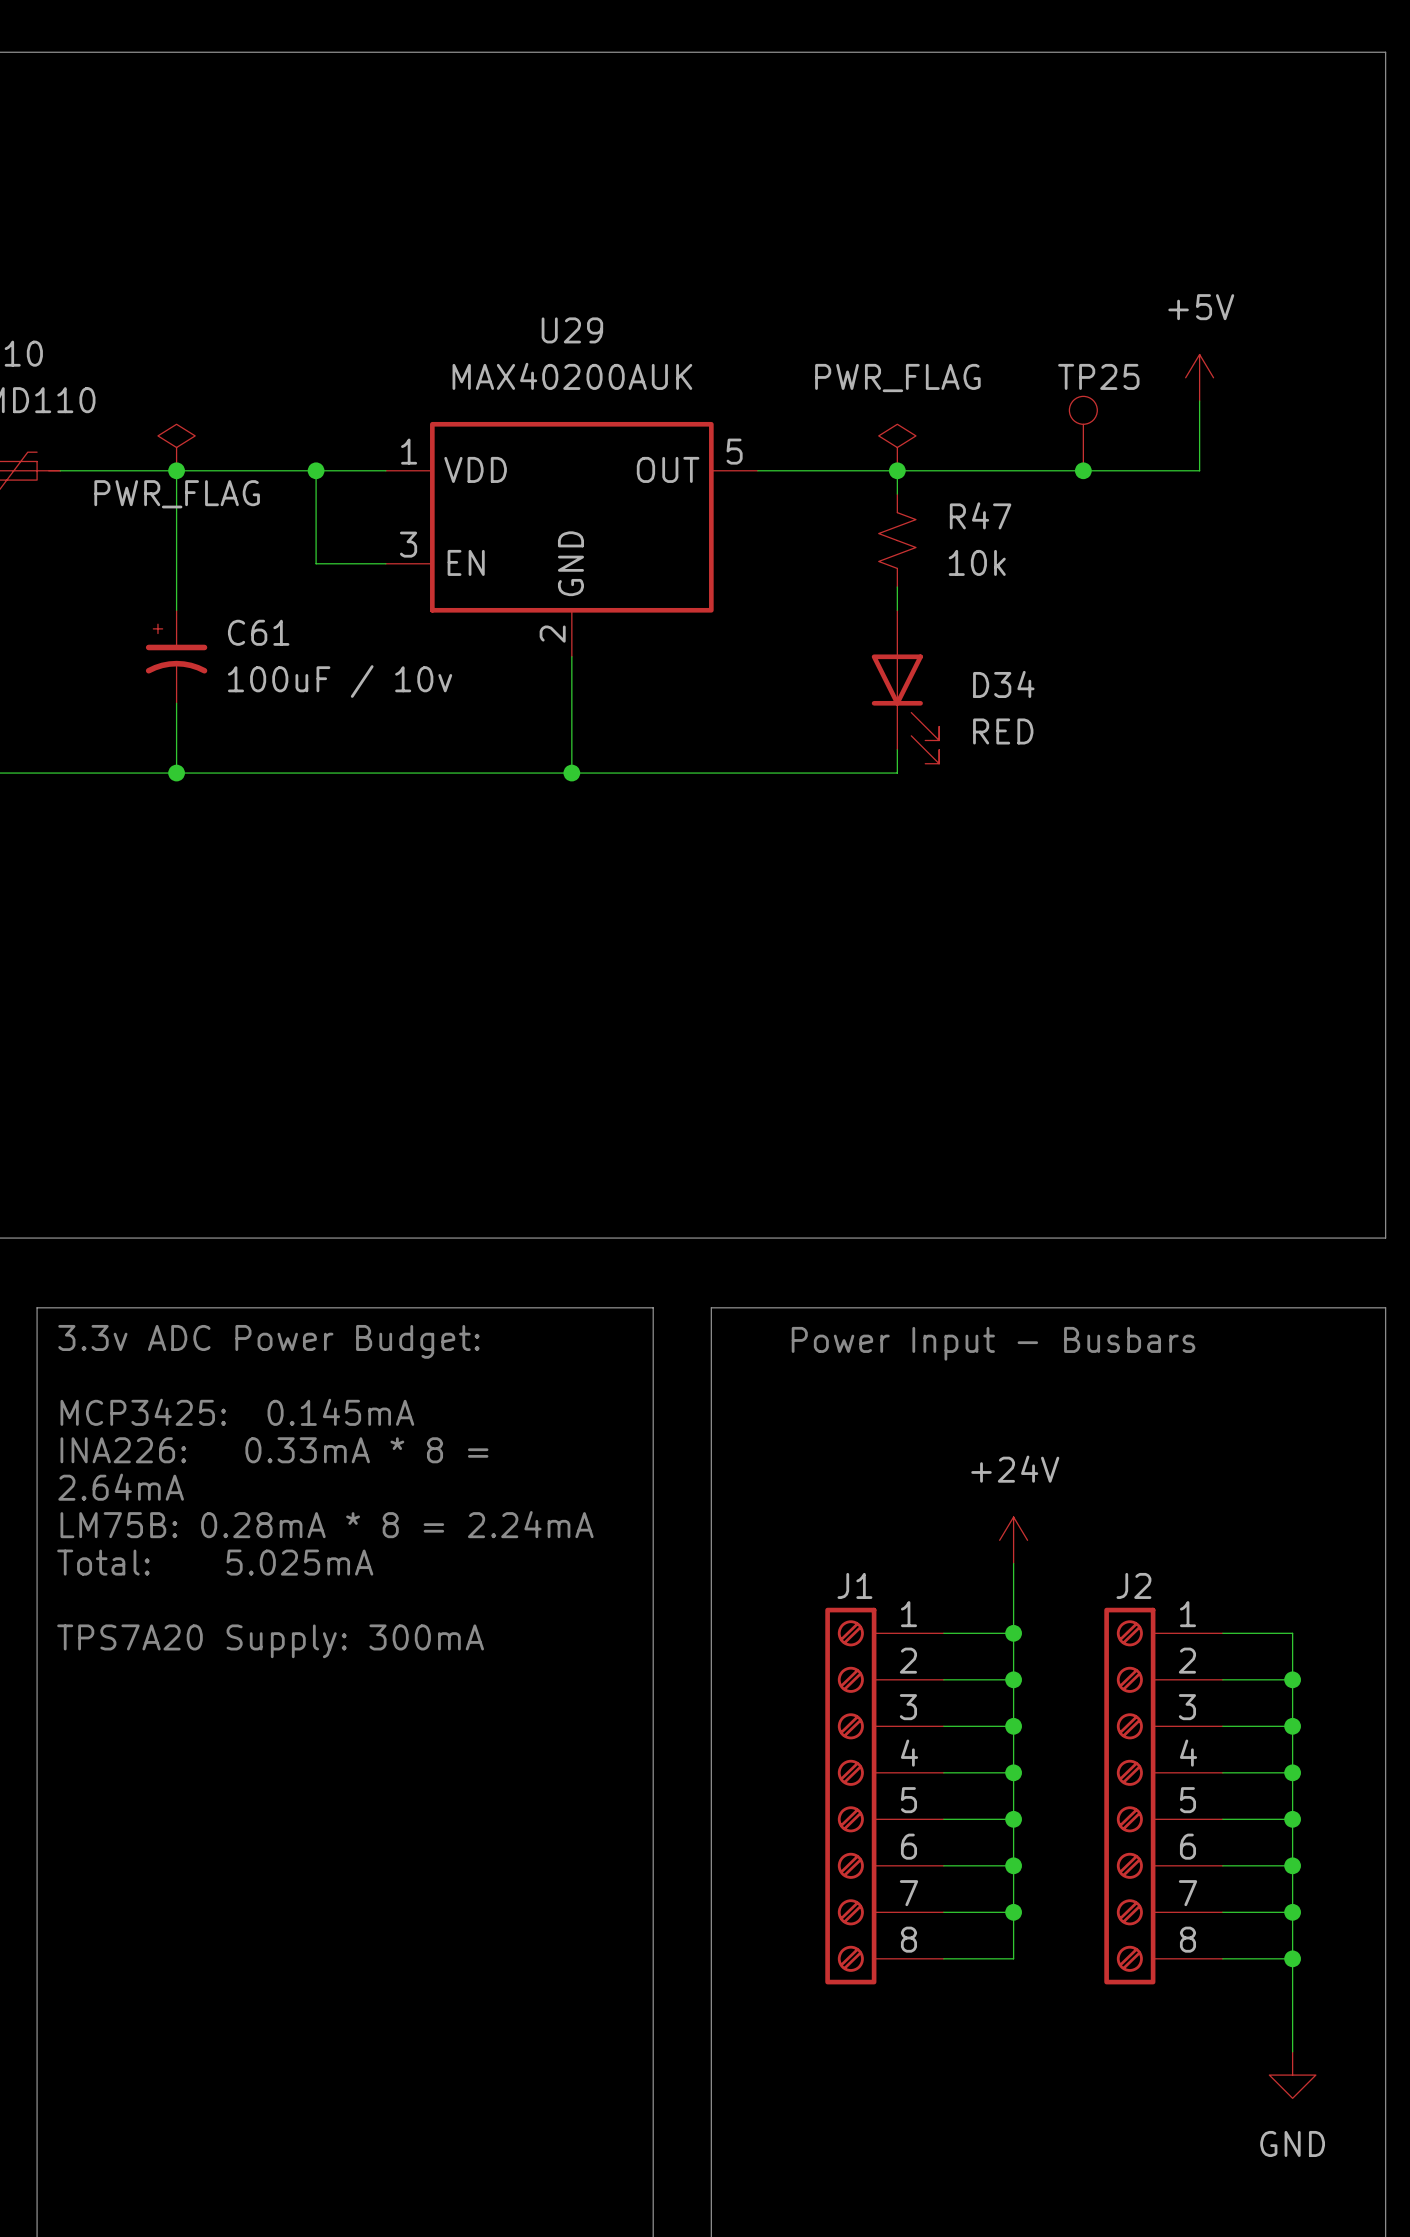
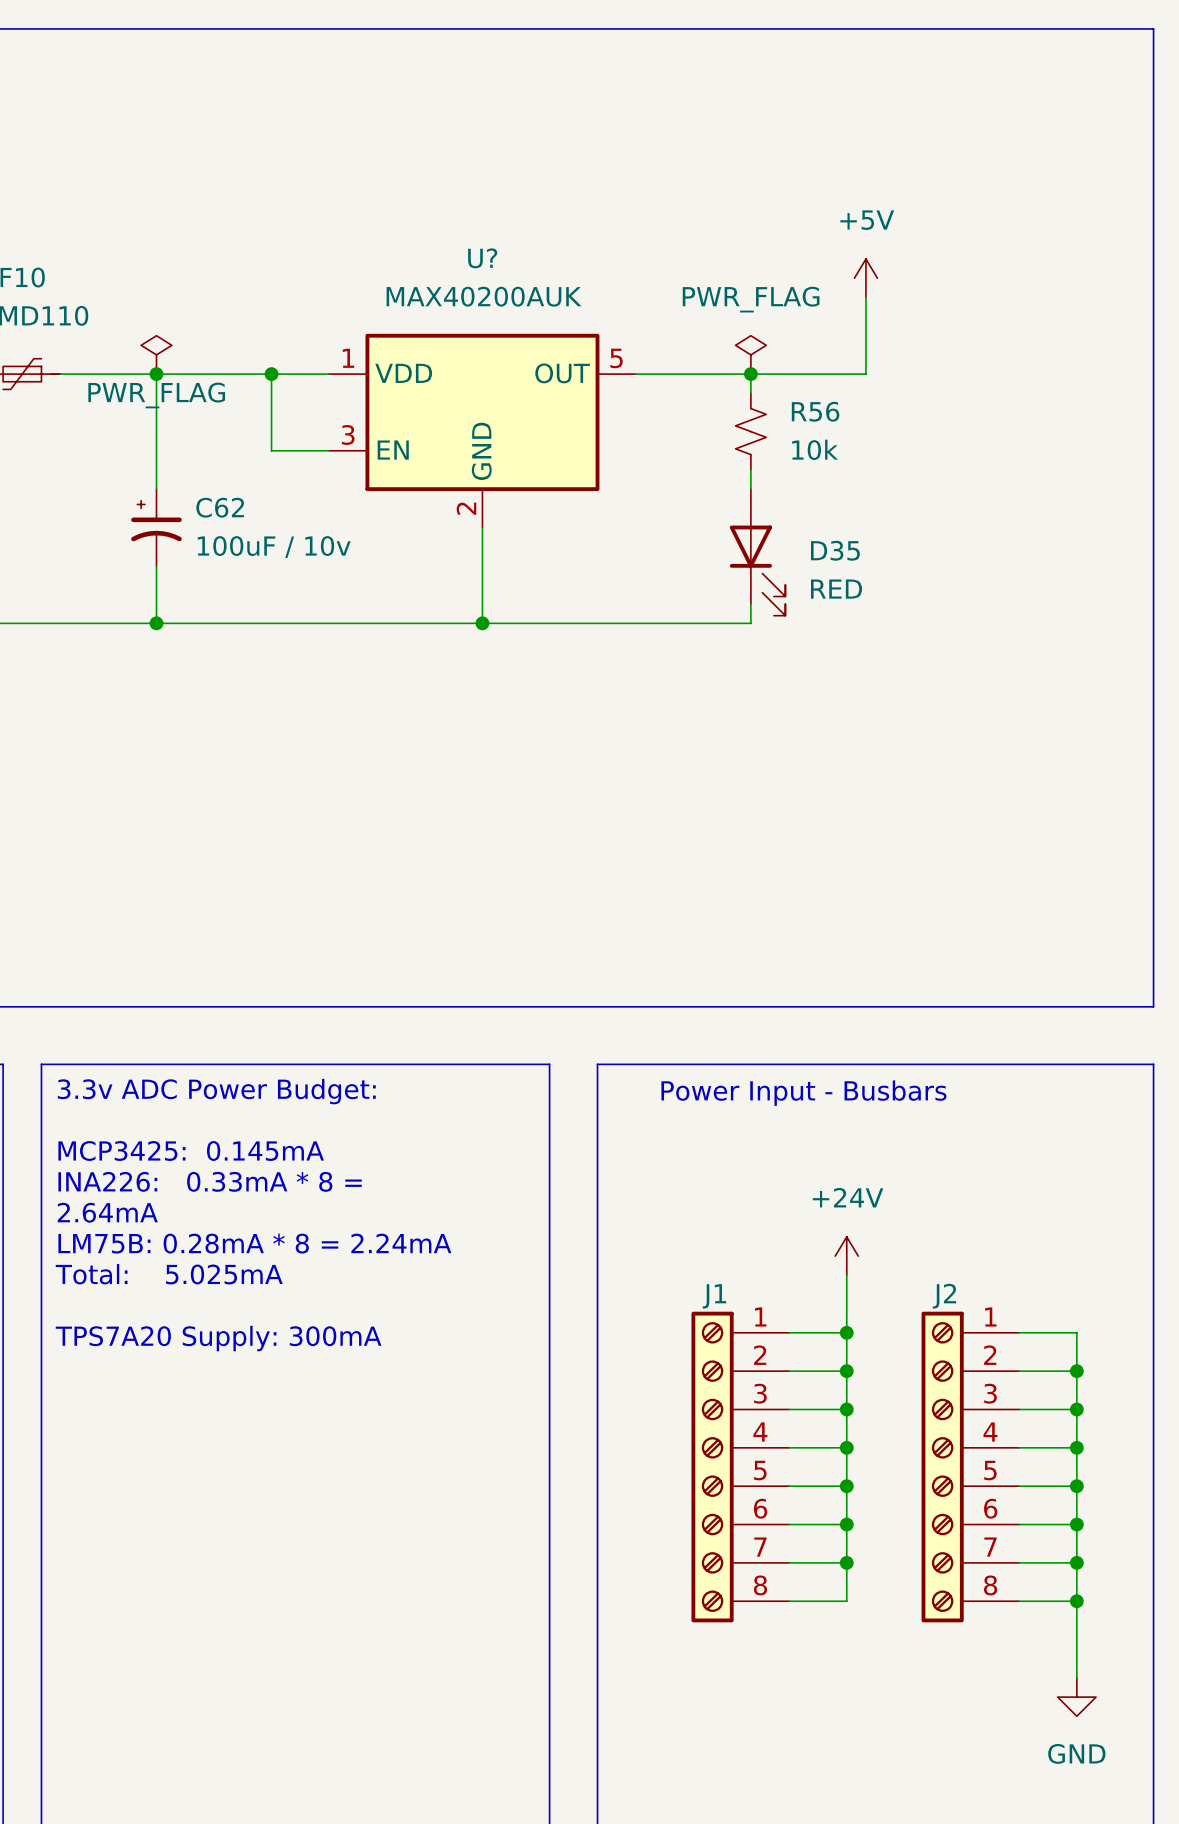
U29 name: U29 (572, 330) -> U? (482, 258)
power symbol position: +5V (1199, 377) -> +5V (865, 278)
wire: (1199, 401) (1199, 470) (1036, 470) -> (865, 297) (865, 374)
TP25: (1083, 433) -> none
junction: (1083, 470) -> none
R47 name: R47 (980, 515) -> R56 (815, 411)
C61 name: C61 (258, 632) -> C62 (220, 507)
D34 name: D34 (1003, 684) -> D35 (835, 550)

